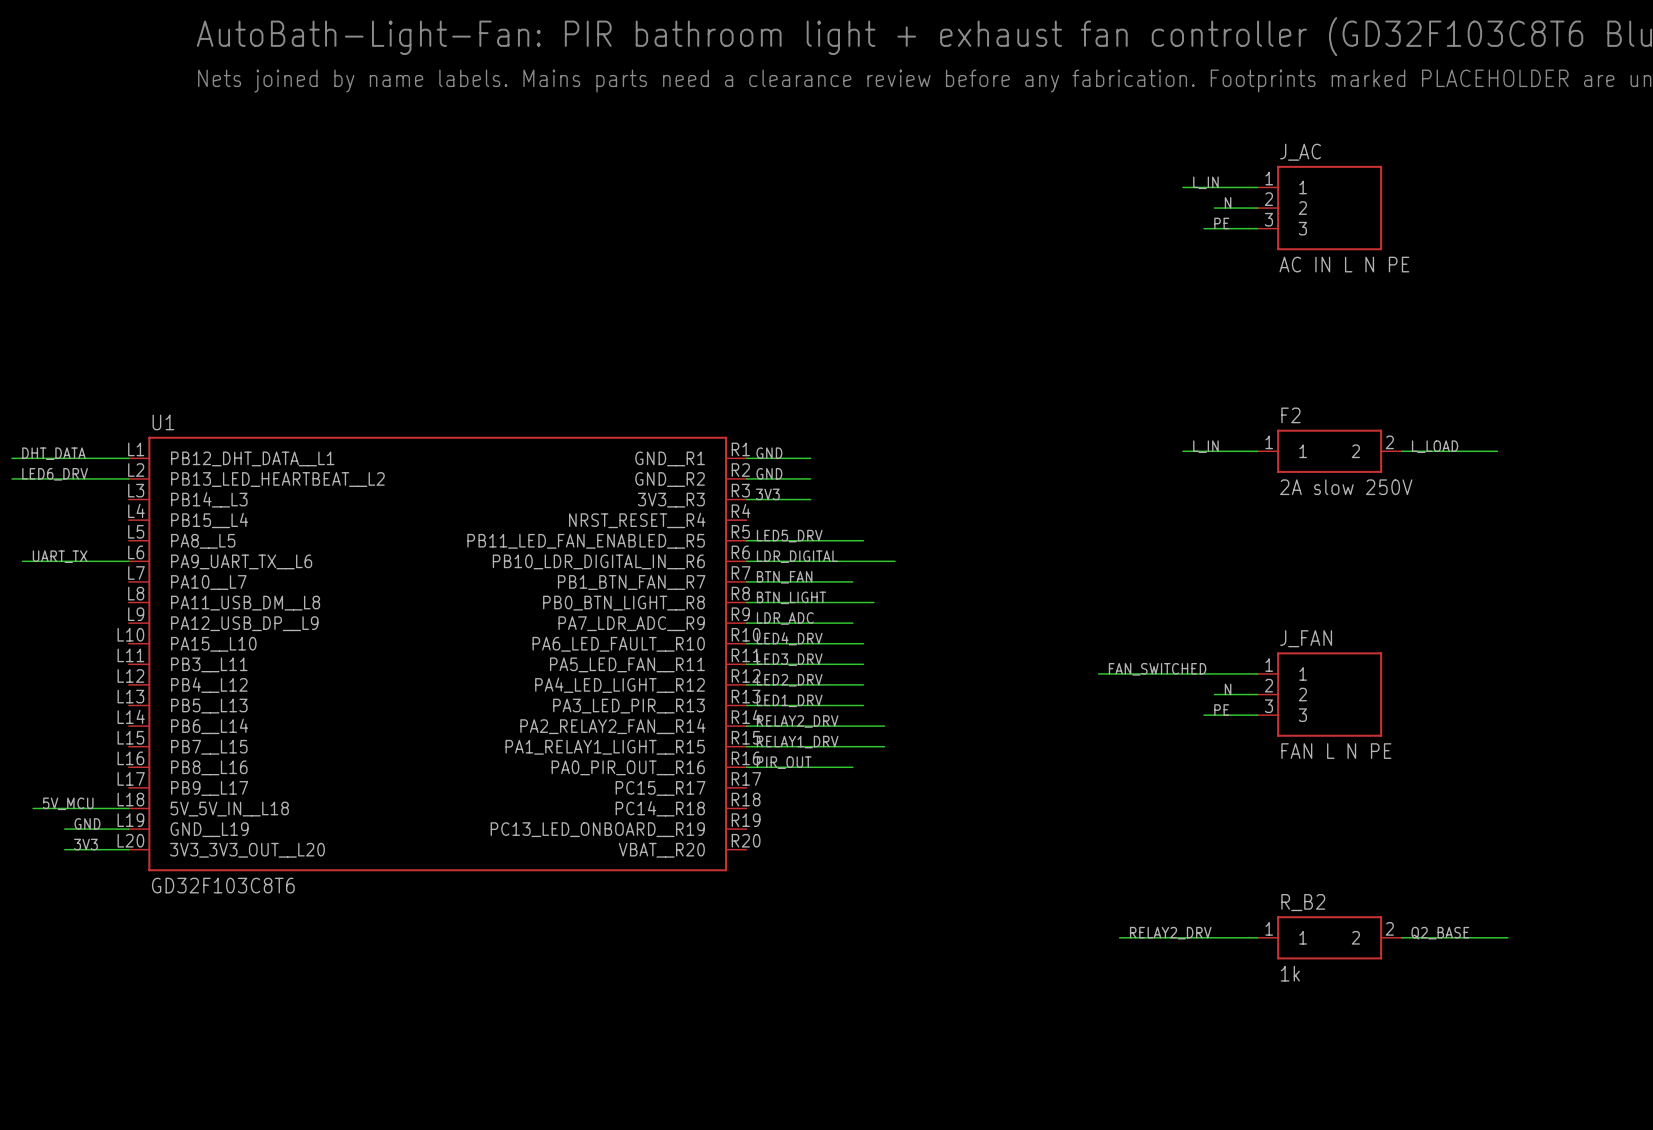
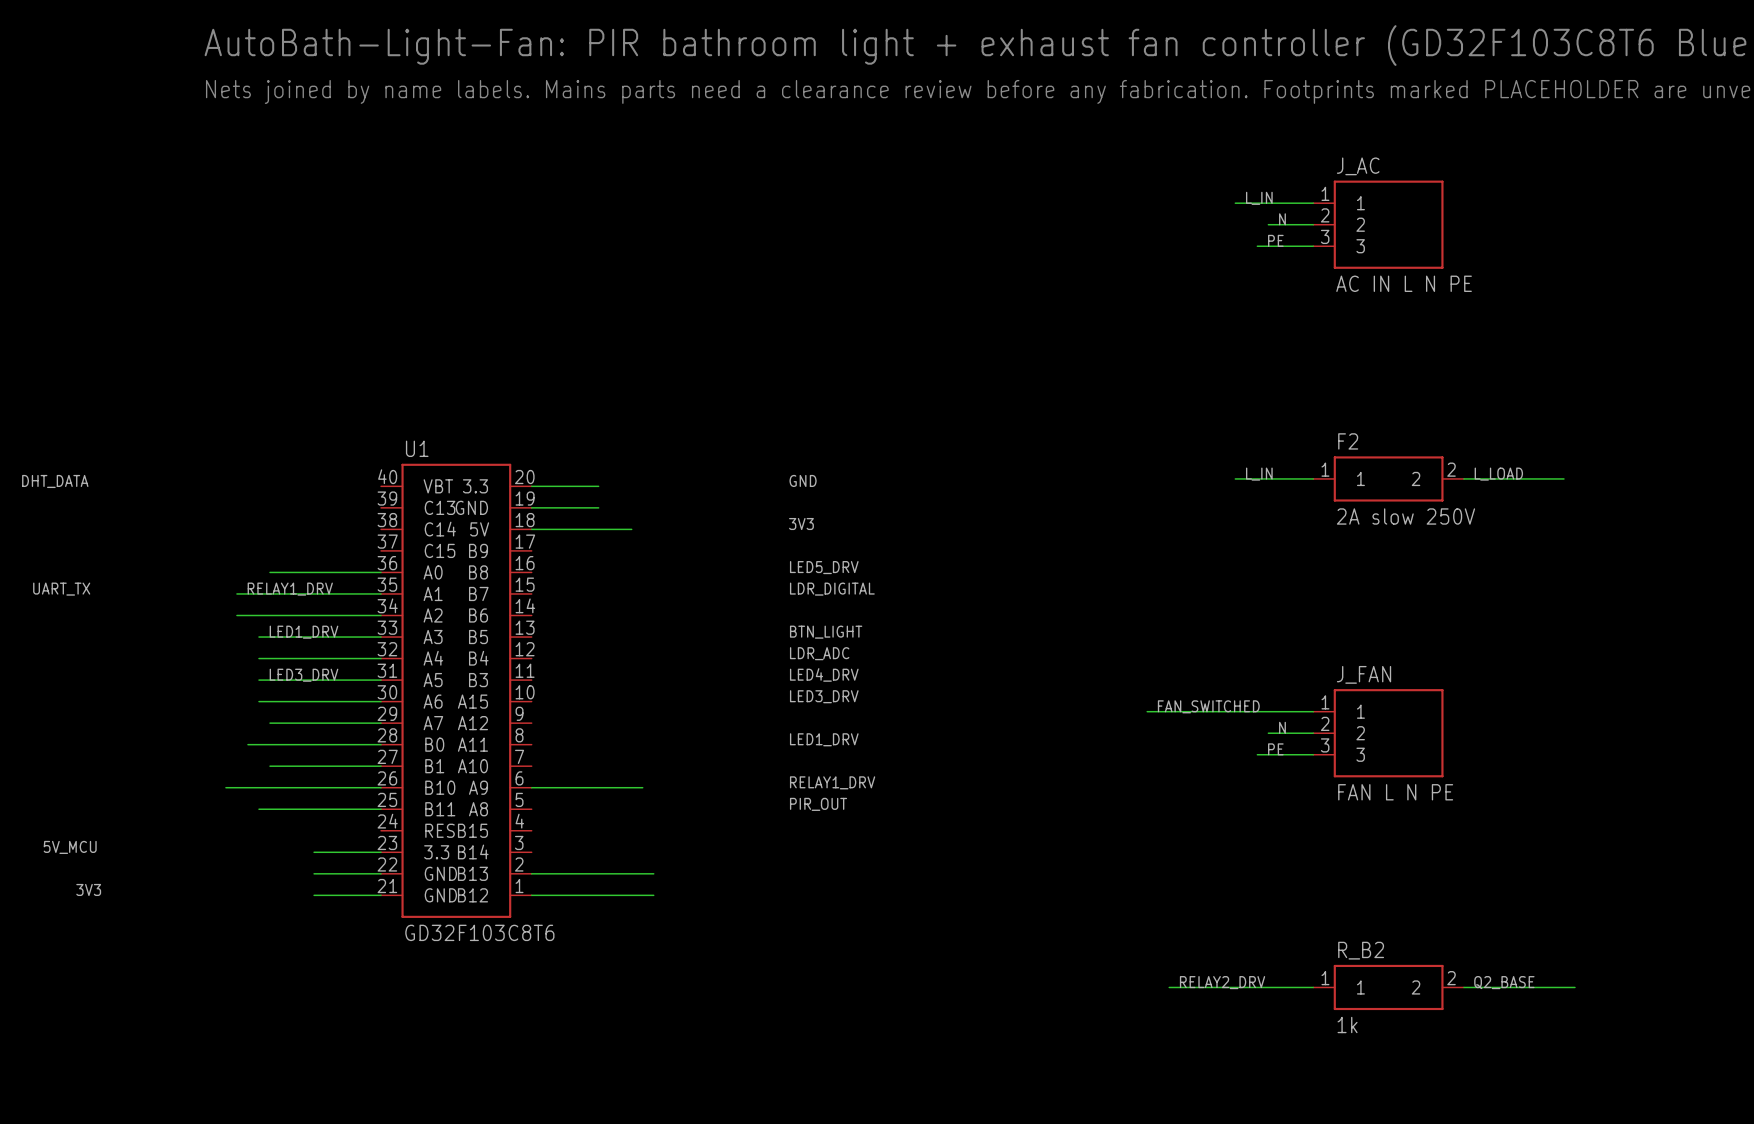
U1 name position: U1 (163, 422) -> U1 (417, 448)
U1 symbol: [128, 436, 747, 872] -> [381, 463, 532, 918]
wire: (12, 458) (128, 458) -> none
wire: none -> (531, 486) (598, 486)
wire: (746, 458) (810, 458) -> none
label: GND (769, 473) -> none
label: LED6_DRV (55, 474) -> none
wire: (12, 478) (128, 478) -> none
wire: none -> (531, 507) (598, 507)
wire: (746, 478) (810, 478) -> none
wire: none -> (531, 529) (631, 529)
wire: (746, 499) (810, 499) -> none
wire: none -> (269, 572) (381, 572)
wire: (746, 540) (863, 540) -> none
label: none -> RELAY1_DRV (290, 589)
wire: (22, 561) (128, 561) -> none
wire: none -> (236, 593) (381, 593)
wire: (746, 561) (895, 561) -> none
label: BTN_FAN (784, 577) -> none
wire: none -> (236, 615) (381, 615)
wire: (746, 581) (852, 581) -> none
label: none -> LED1_DRV (304, 632)
wire: none -> (258, 637) (381, 637)
wire: (746, 602) (873, 602) -> none
wire: none -> (258, 658) (381, 658)
wire: (746, 623) (852, 623) -> none
label: none -> LED3_DRV (304, 675)
wire: none -> (258, 680) (381, 680)
wire: (746, 643) (863, 643) -> none
wire: none -> (258, 701) (381, 701)
wire: (746, 664) (863, 664) -> none
label: LED2_DRV (789, 680) -> none
wire: none -> (269, 723) (381, 723)
wire: (746, 684) (863, 684) -> none
wire: none -> (247, 744) (381, 744)
wire: (746, 705) (863, 705) -> none
label: RELAY2_DRV (797, 721) -> none
wire: none -> (269, 766) (381, 766)
wire: (746, 726) (884, 726) -> none
wire: none -> (225, 787) (381, 787)
wire: none -> (531, 787) (642, 787)
wire: (746, 746) (884, 746) -> none
wire: none -> (258, 809) (381, 809)
wire: (746, 767) (852, 767) -> none
wire: (33, 808) (128, 808) -> none
wire: none -> (314, 852) (381, 852)
label: GND (87, 823) -> none
wire: (64, 829) (128, 829) -> none
wire: none -> (314, 873) (381, 873)
wire: none -> (531, 873) (653, 873)
wire: (64, 849) (128, 849) -> none
wire: none -> (314, 895) (381, 895)
wire: none -> (531, 895) (653, 895)
U1 value position: GD32F103C8T6 (223, 885) -> GD32F103C8T6 (479, 932)

